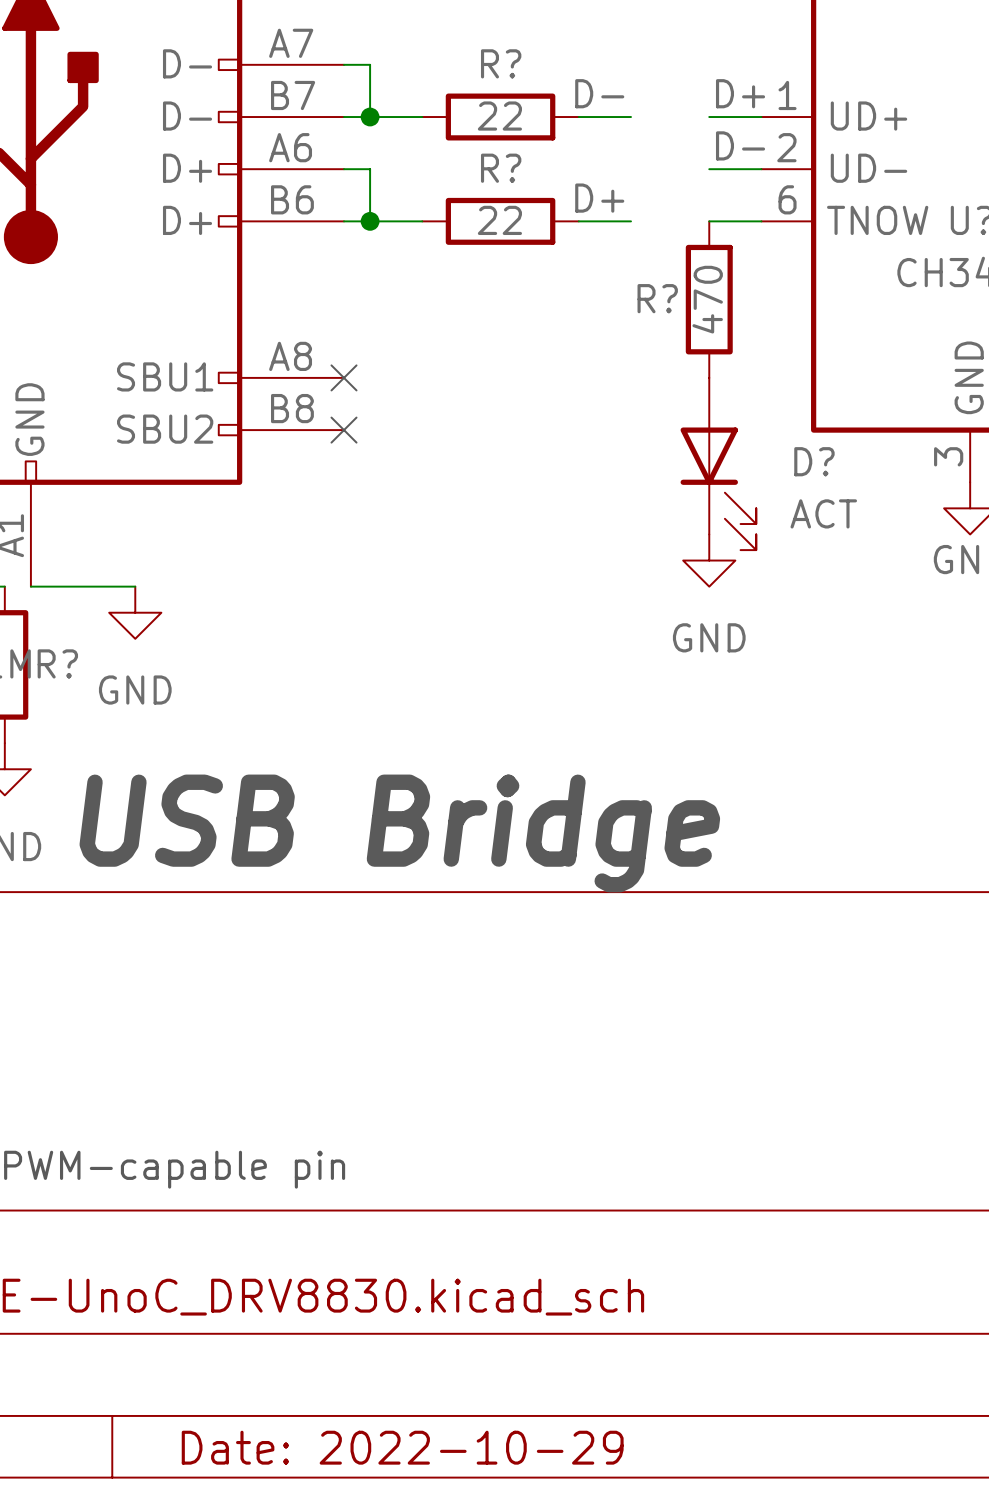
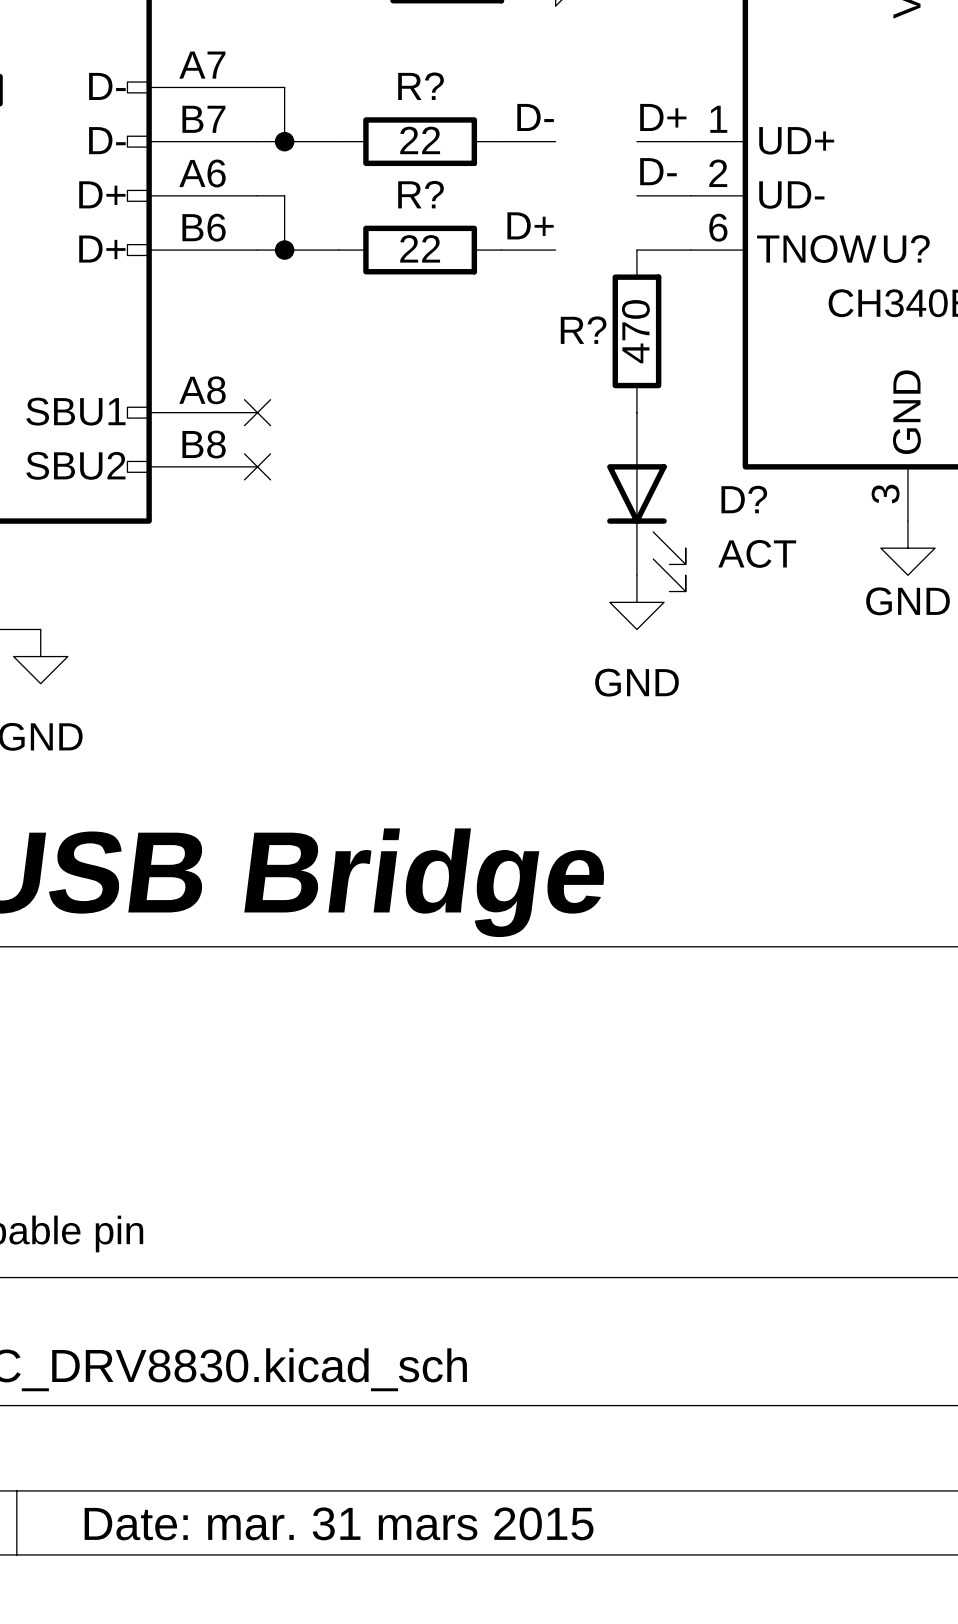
title block: Date: 2022-10-29 (402, 1447) -> Date: mar. 31 mars 2015 (339, 1523)

